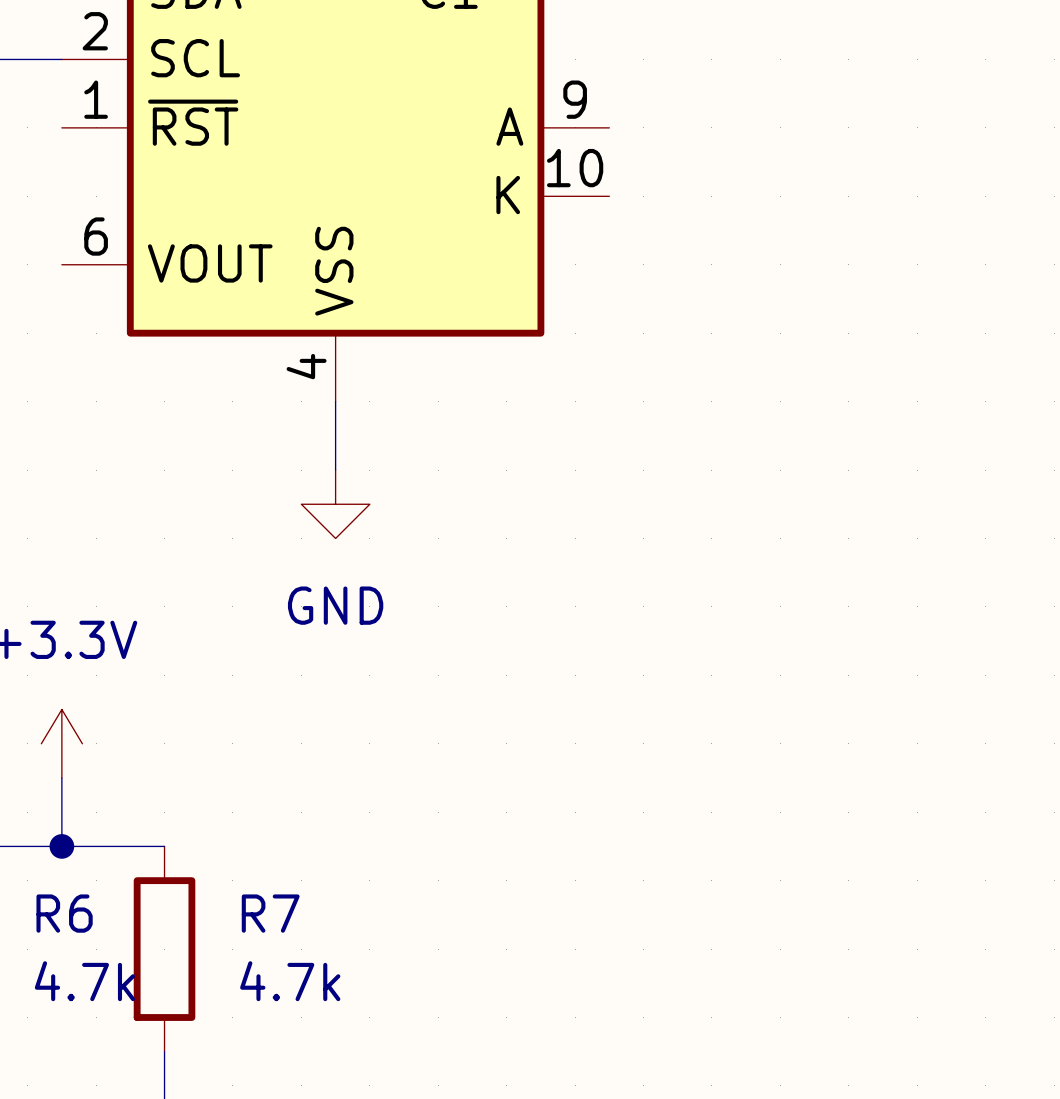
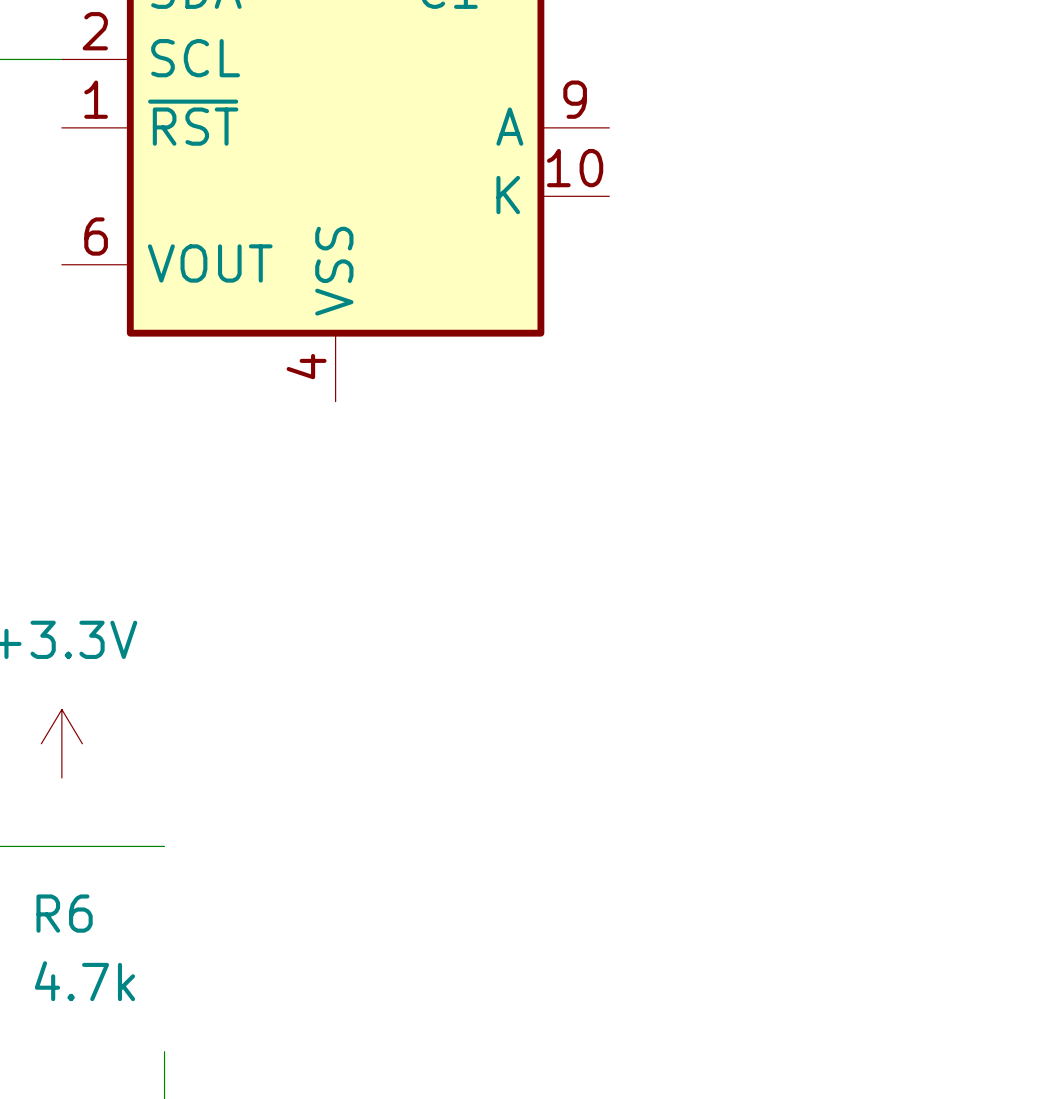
wire: (335, 401) (335, 470) -> none
power symbol: GND (335, 504) -> none
wire: (61, 777) (61, 846) -> none
junction: (61, 846) -> none
R7: 4.7k (164, 949) -> none

